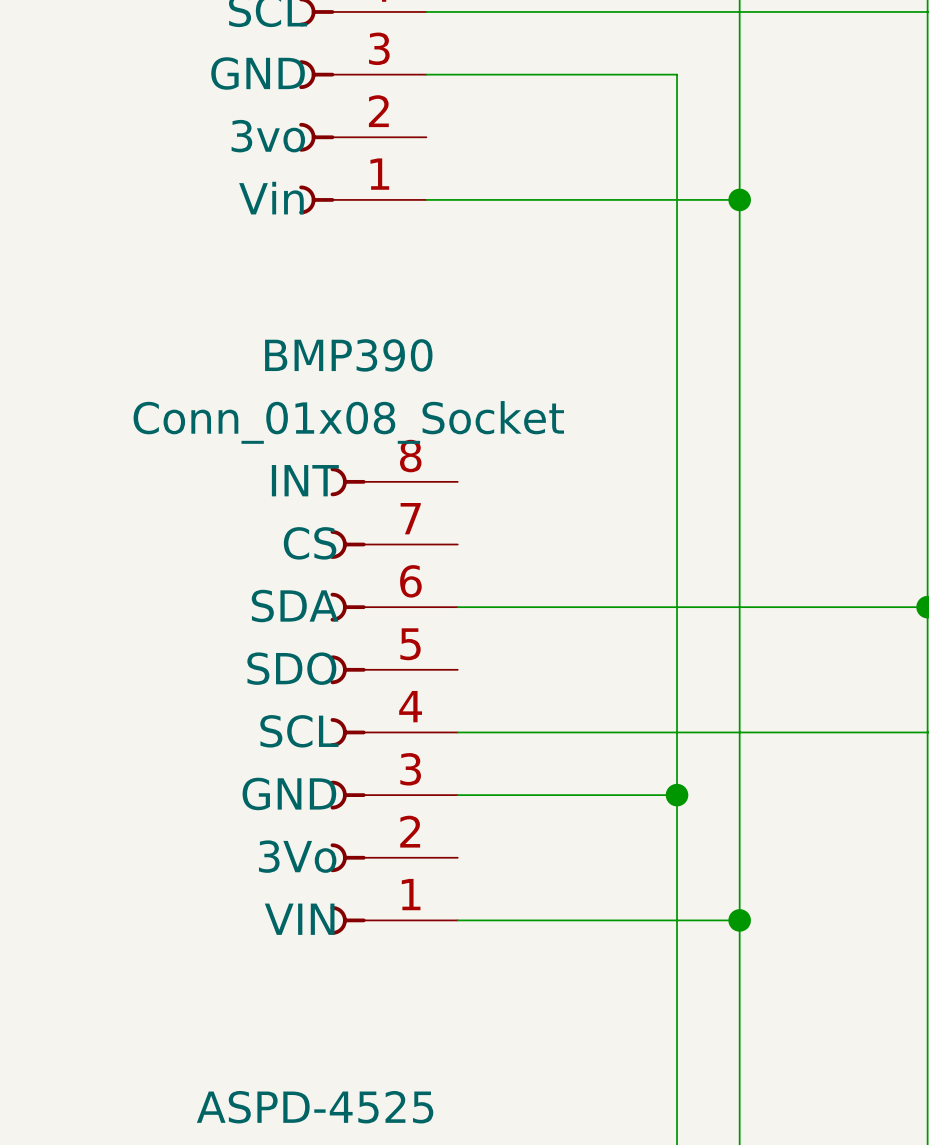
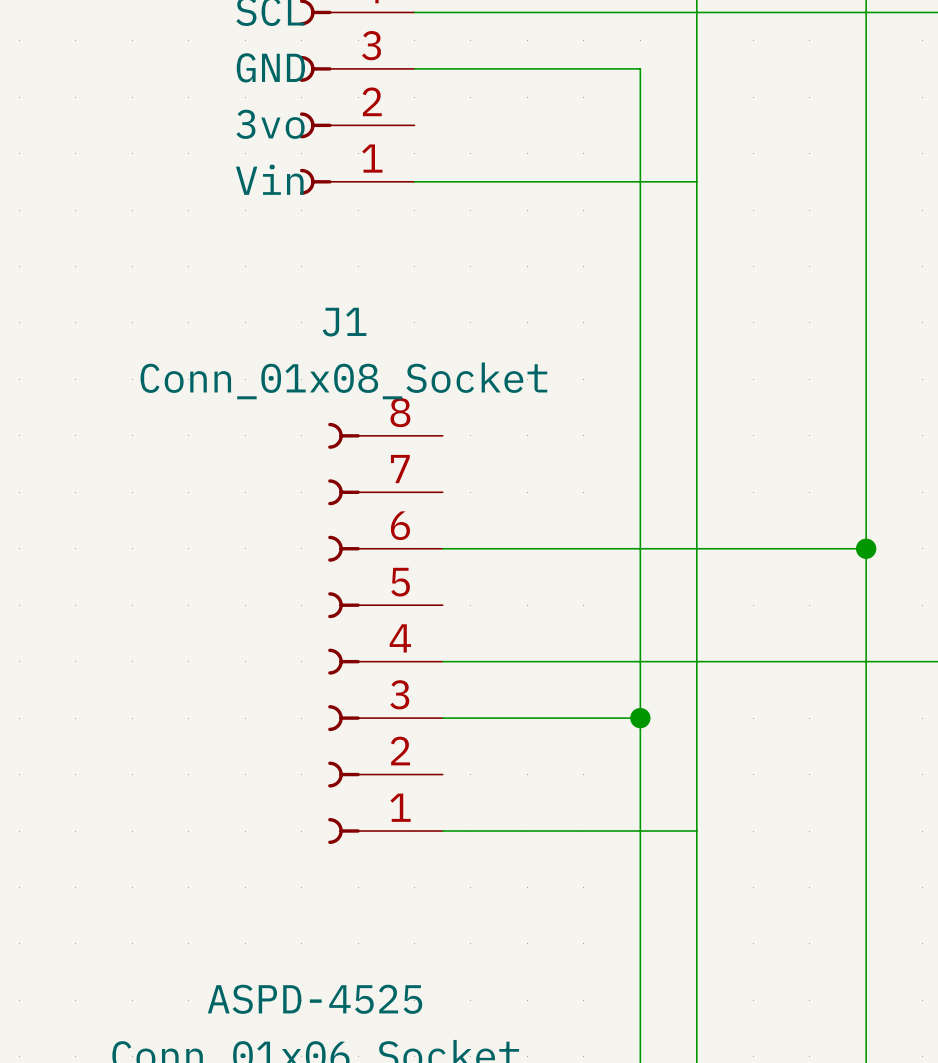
junction: (739, 199) -> none
BMP390 name: BMP390 (348, 355) -> J1 (344, 322)
BMP390 pin name: INT (305, 480) -> none
BMP390 pin name: CS (310, 543) -> none
BMP390 pin name: SDA (295, 606) -> none
BMP390 pin name: SDO (291, 668) -> none
BMP390 pin name: SCL (299, 731) -> none
BMP390 pin name: GND (289, 793) -> none
BMP390 pin name: 3Vo (297, 856) -> none
BMP390 pin name: VIN (299, 919) -> none
junction: (739, 920) -> none

